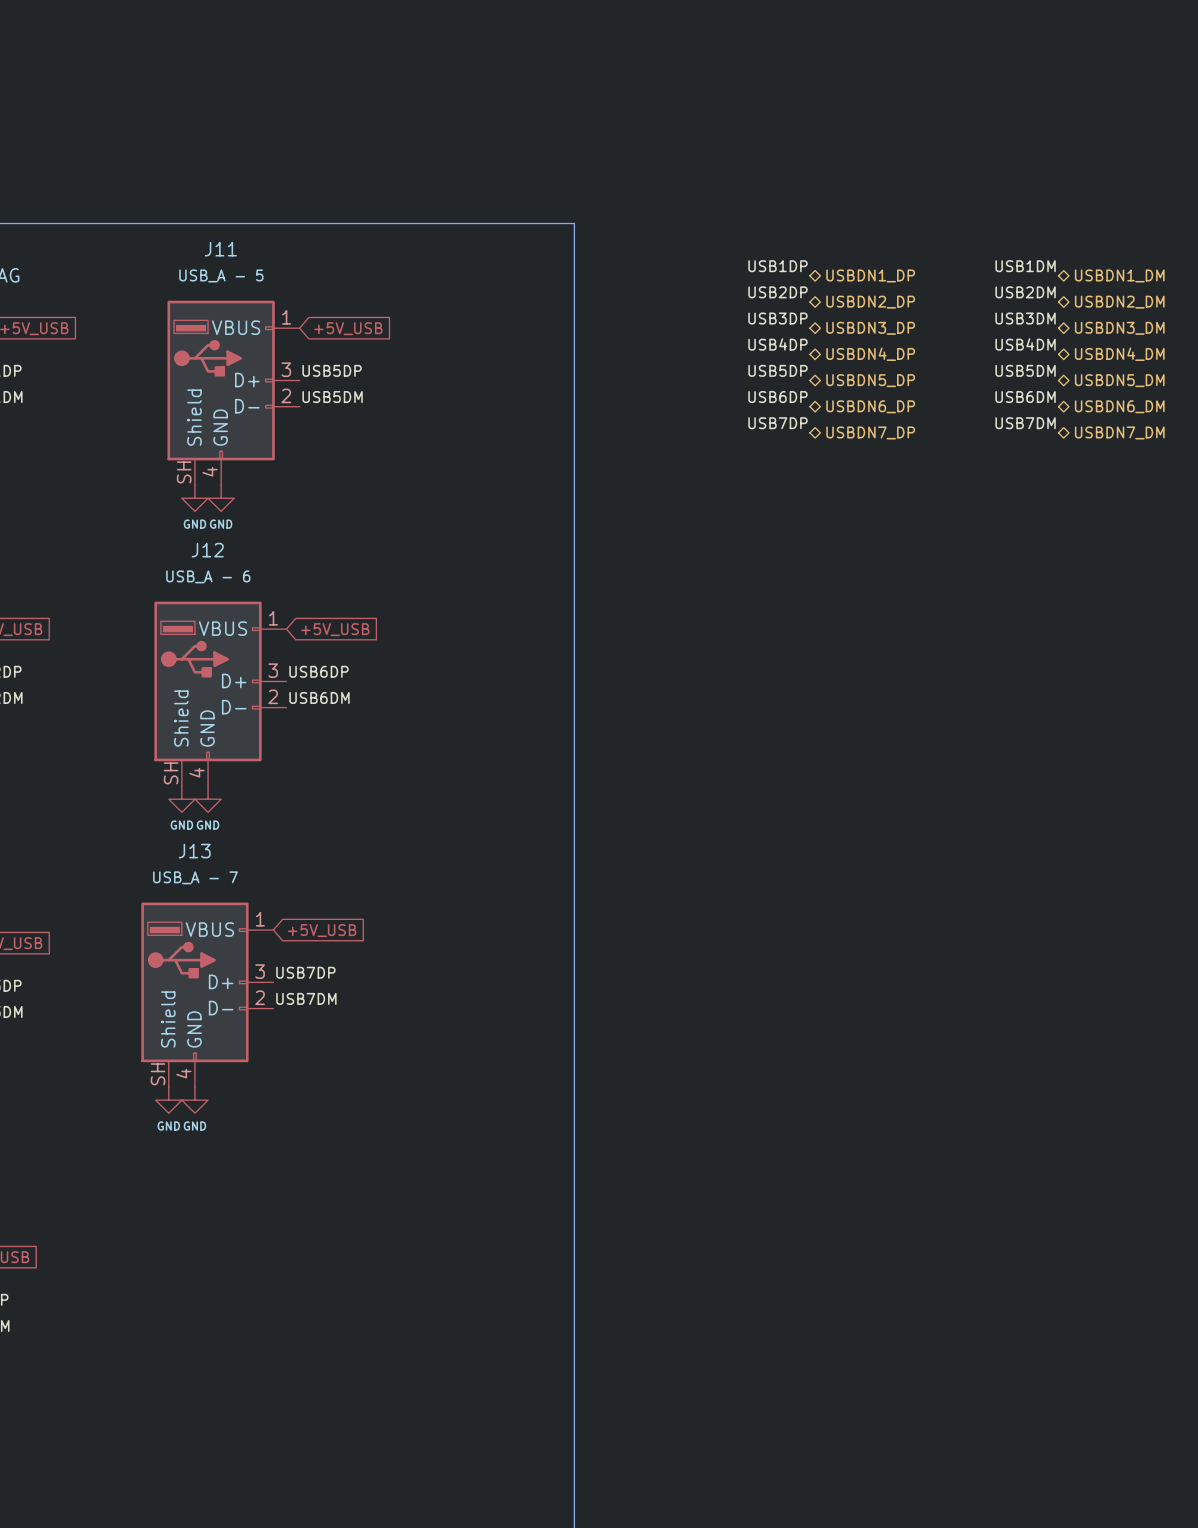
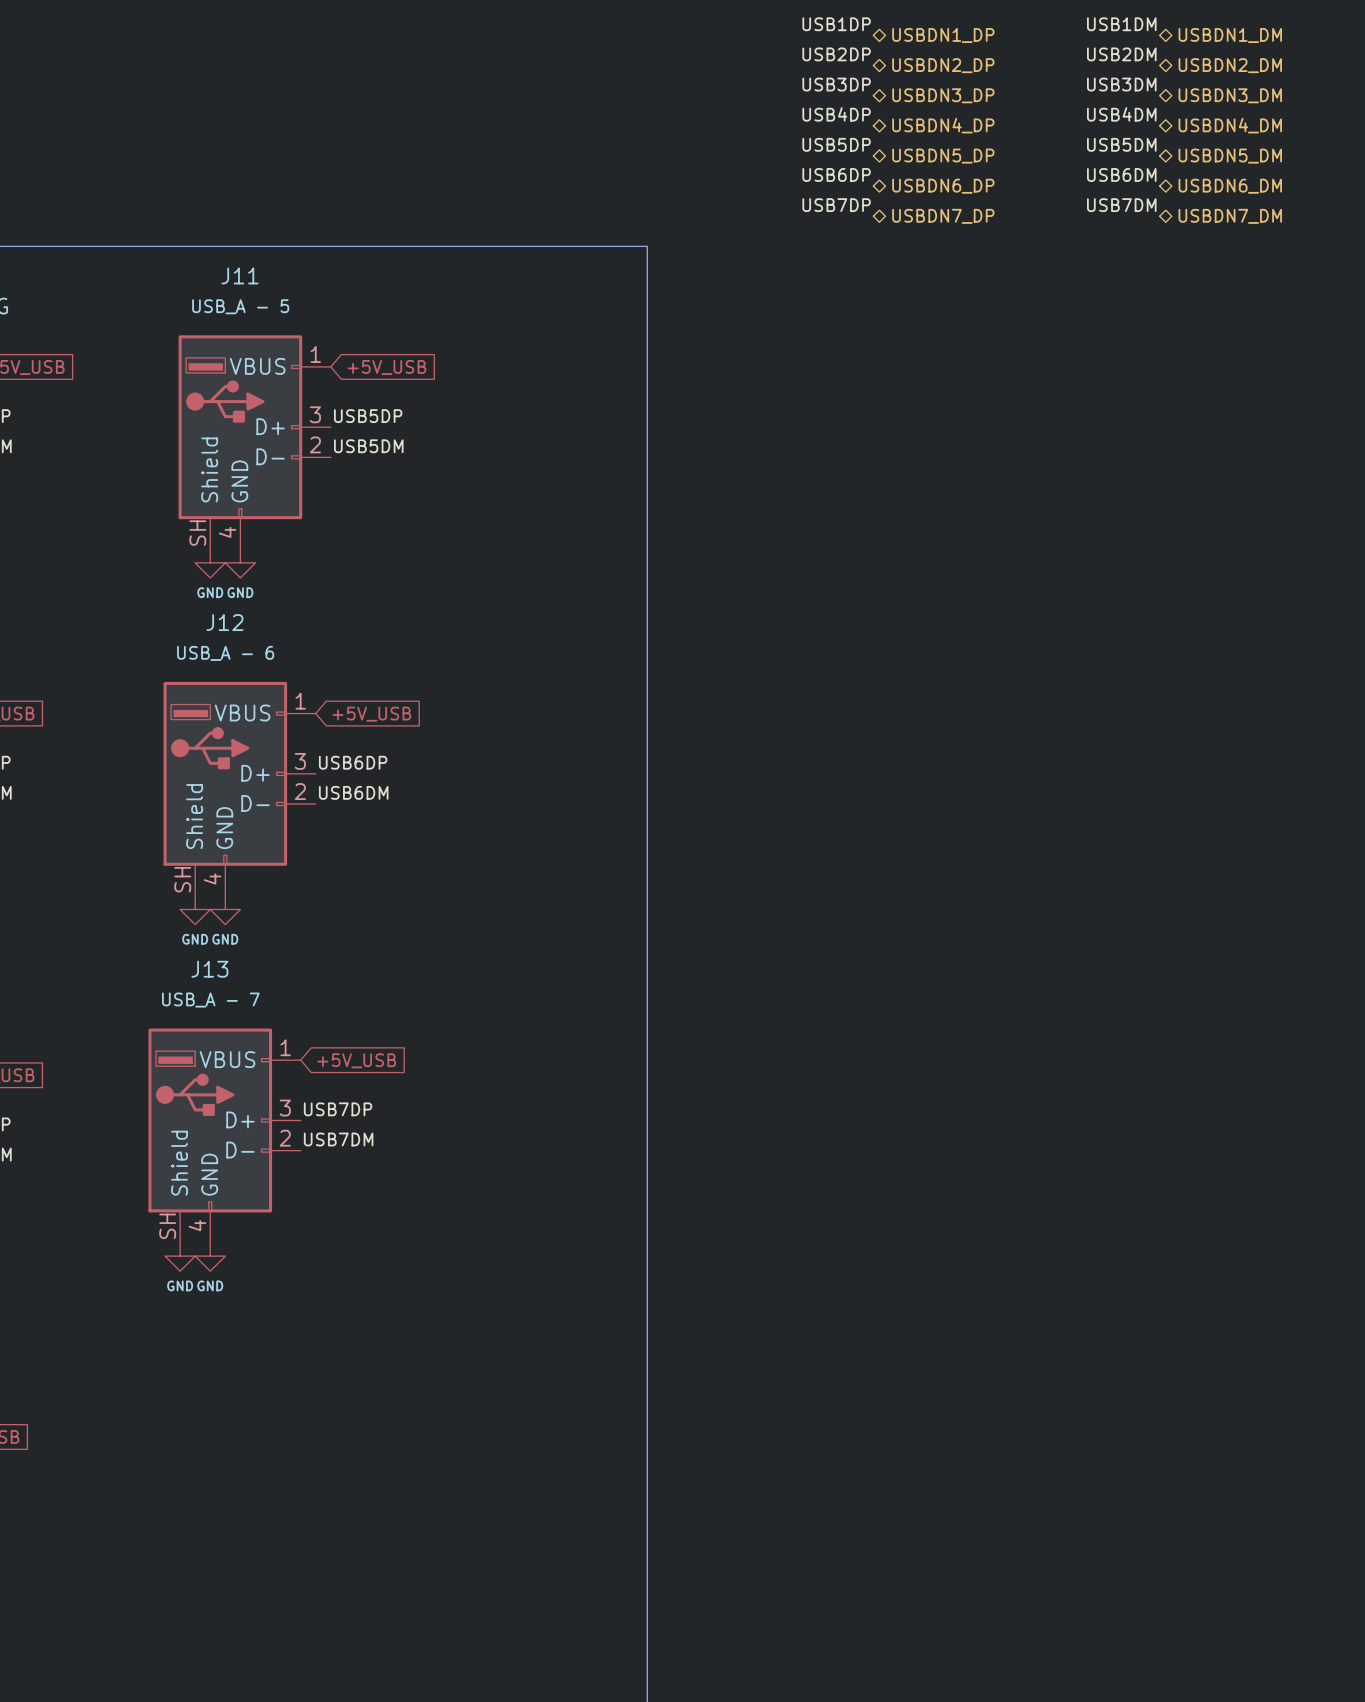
label position: USB1DP (777, 266) -> USB1DP (836, 24)
label position: USB1DM (1025, 266) -> USB1DM (1121, 24)
hierarchical label position: USBDN1_DP (870, 275) -> USBDN1_DP (943, 35)
hierarchical label position: USBDN1_DM (1119, 275) -> USBDN1_DM (1230, 35)
label position: USB2DP (777, 292) -> USB2DP (836, 54)
label position: USB2DM (1025, 292) -> USB2DM (1121, 54)
hierarchical label position: USBDN2_DP (870, 302) -> USBDN2_DP (943, 65)
hierarchical label position: USBDN2_DM (1119, 302) -> USBDN2_DM (1230, 65)
label position: USB3DP (777, 318) -> USB3DP (836, 84)
label position: USB3DM (1025, 318) -> USB3DM (1121, 84)
hierarchical label position: USBDN3_DP (870, 328) -> USBDN3_DP (943, 95)
hierarchical label position: USBDN3_DM (1119, 328) -> USBDN3_DM (1230, 95)
label position: USB4DP (777, 344) -> USB4DP (836, 114)
label position: USB4DM (1025, 344) -> USB4DM (1121, 114)
hierarchical label position: USBDN4_DP (870, 354) -> USBDN4_DP (943, 125)
hierarchical label position: USBDN4_DM (1119, 354) -> USBDN4_DM (1230, 125)
label position: USB5DP (777, 370) -> USB5DP (836, 144)
label position: USB5DM (1025, 370) -> USB5DM (1121, 144)
hierarchical label position: USBDN5_DP (870, 380) -> USBDN5_DP (943, 156)
hierarchical label position: USBDN5_DM (1119, 380) -> USBDN5_DM (1230, 156)
label position: USB6DP (777, 397) -> USB6DP (836, 174)
label position: USB6DM (1025, 397) -> USB6DM (1121, 174)
hierarchical label position: USBDN6_DP (870, 406) -> USBDN6_DP (943, 186)
hierarchical label position: USBDN6_DM (1119, 406) -> USBDN6_DM (1230, 186)
label position: USB7DP (777, 423) -> USB7DP (836, 205)
label position: USB7DM (1025, 423) -> USB7DM (1121, 205)
hierarchical label position: USBDN7_DP (870, 432) -> USBDN7_DP (943, 216)
hierarchical label position: USBDN7_DM (1119, 432) -> USBDN7_DM (1230, 216)

